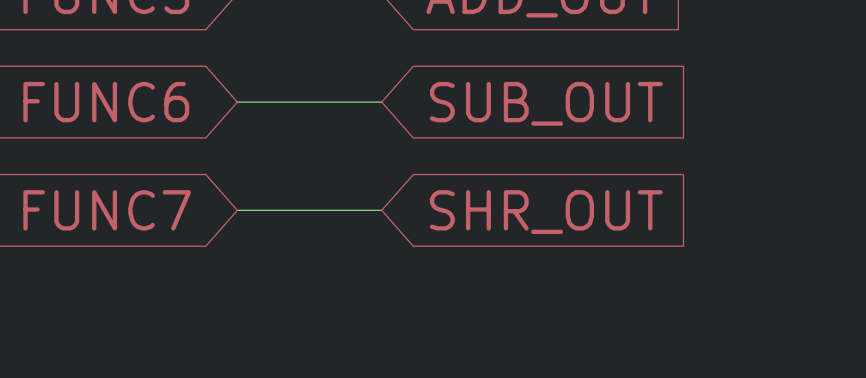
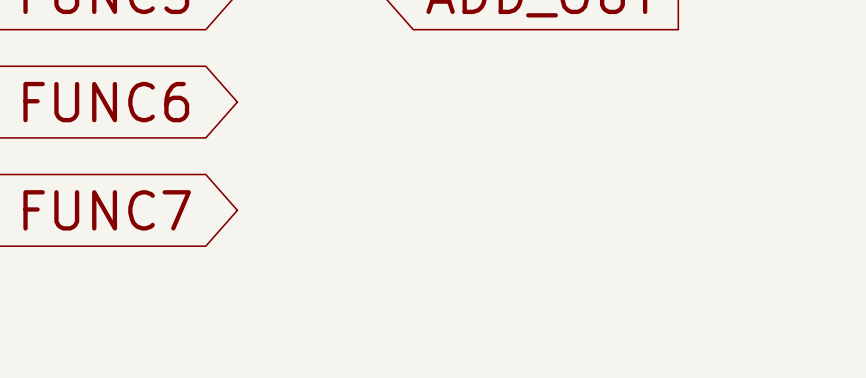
wire: (237, 102) (381, 102) -> none
global label: SUB_OUT (546, 103) -> none
wire: (237, 210) (381, 210) -> none
global label: SHR_OUT (546, 212) -> none

